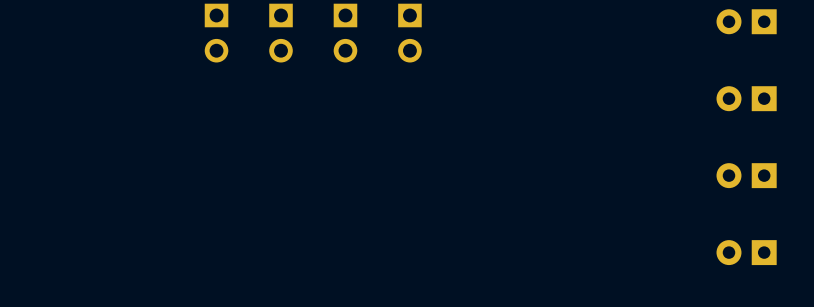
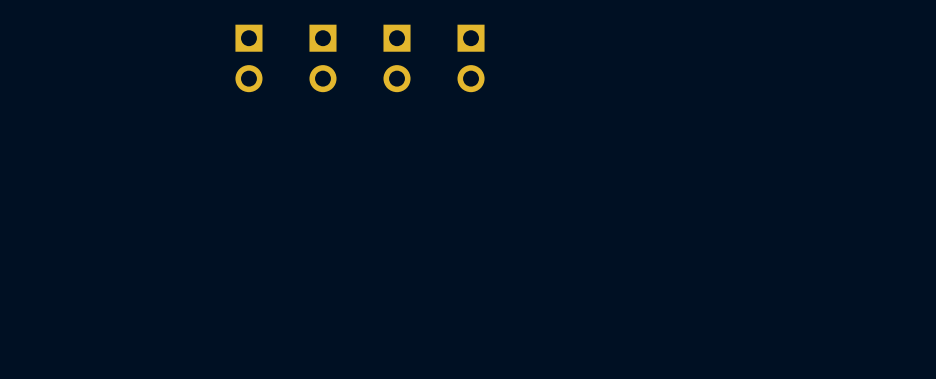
part: (746, 21) -> none
part: (746, 98) -> none
part: (746, 175) -> none
part: (746, 252) -> none

